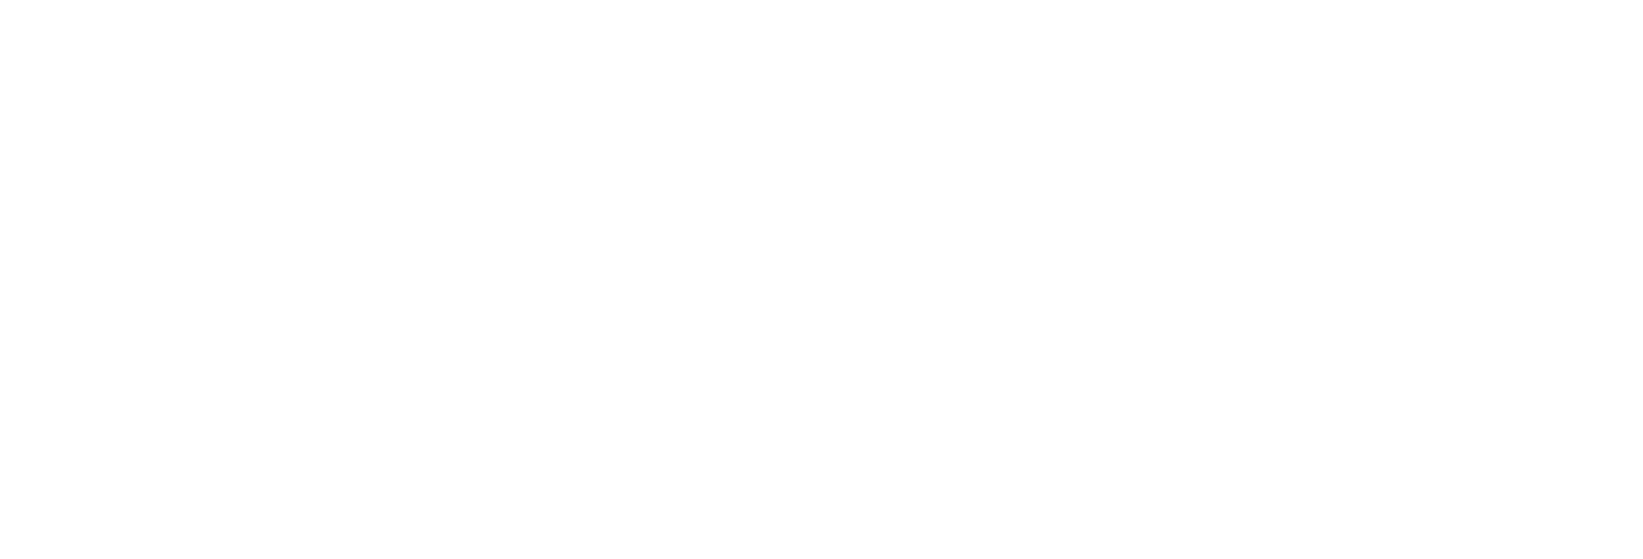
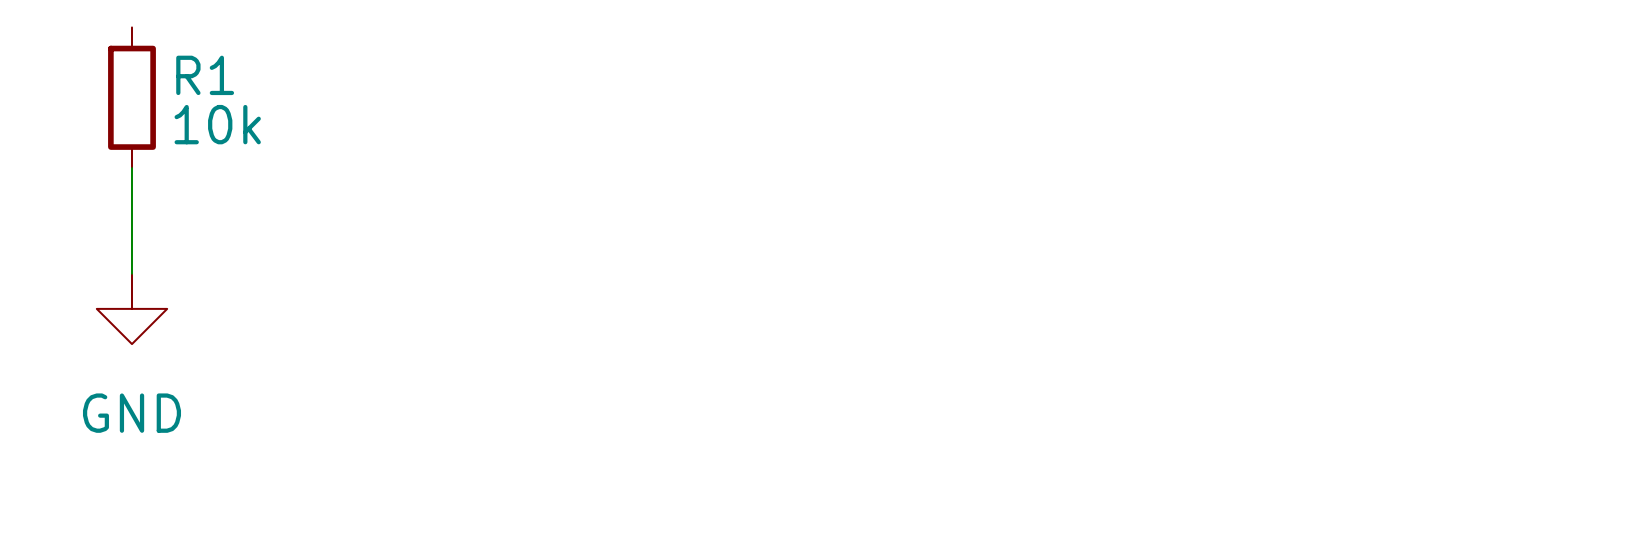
R1: none -> 10k (131, 97)
wire: none -> (131, 168) (131, 273)
power symbol: none -> GND (131, 308)

